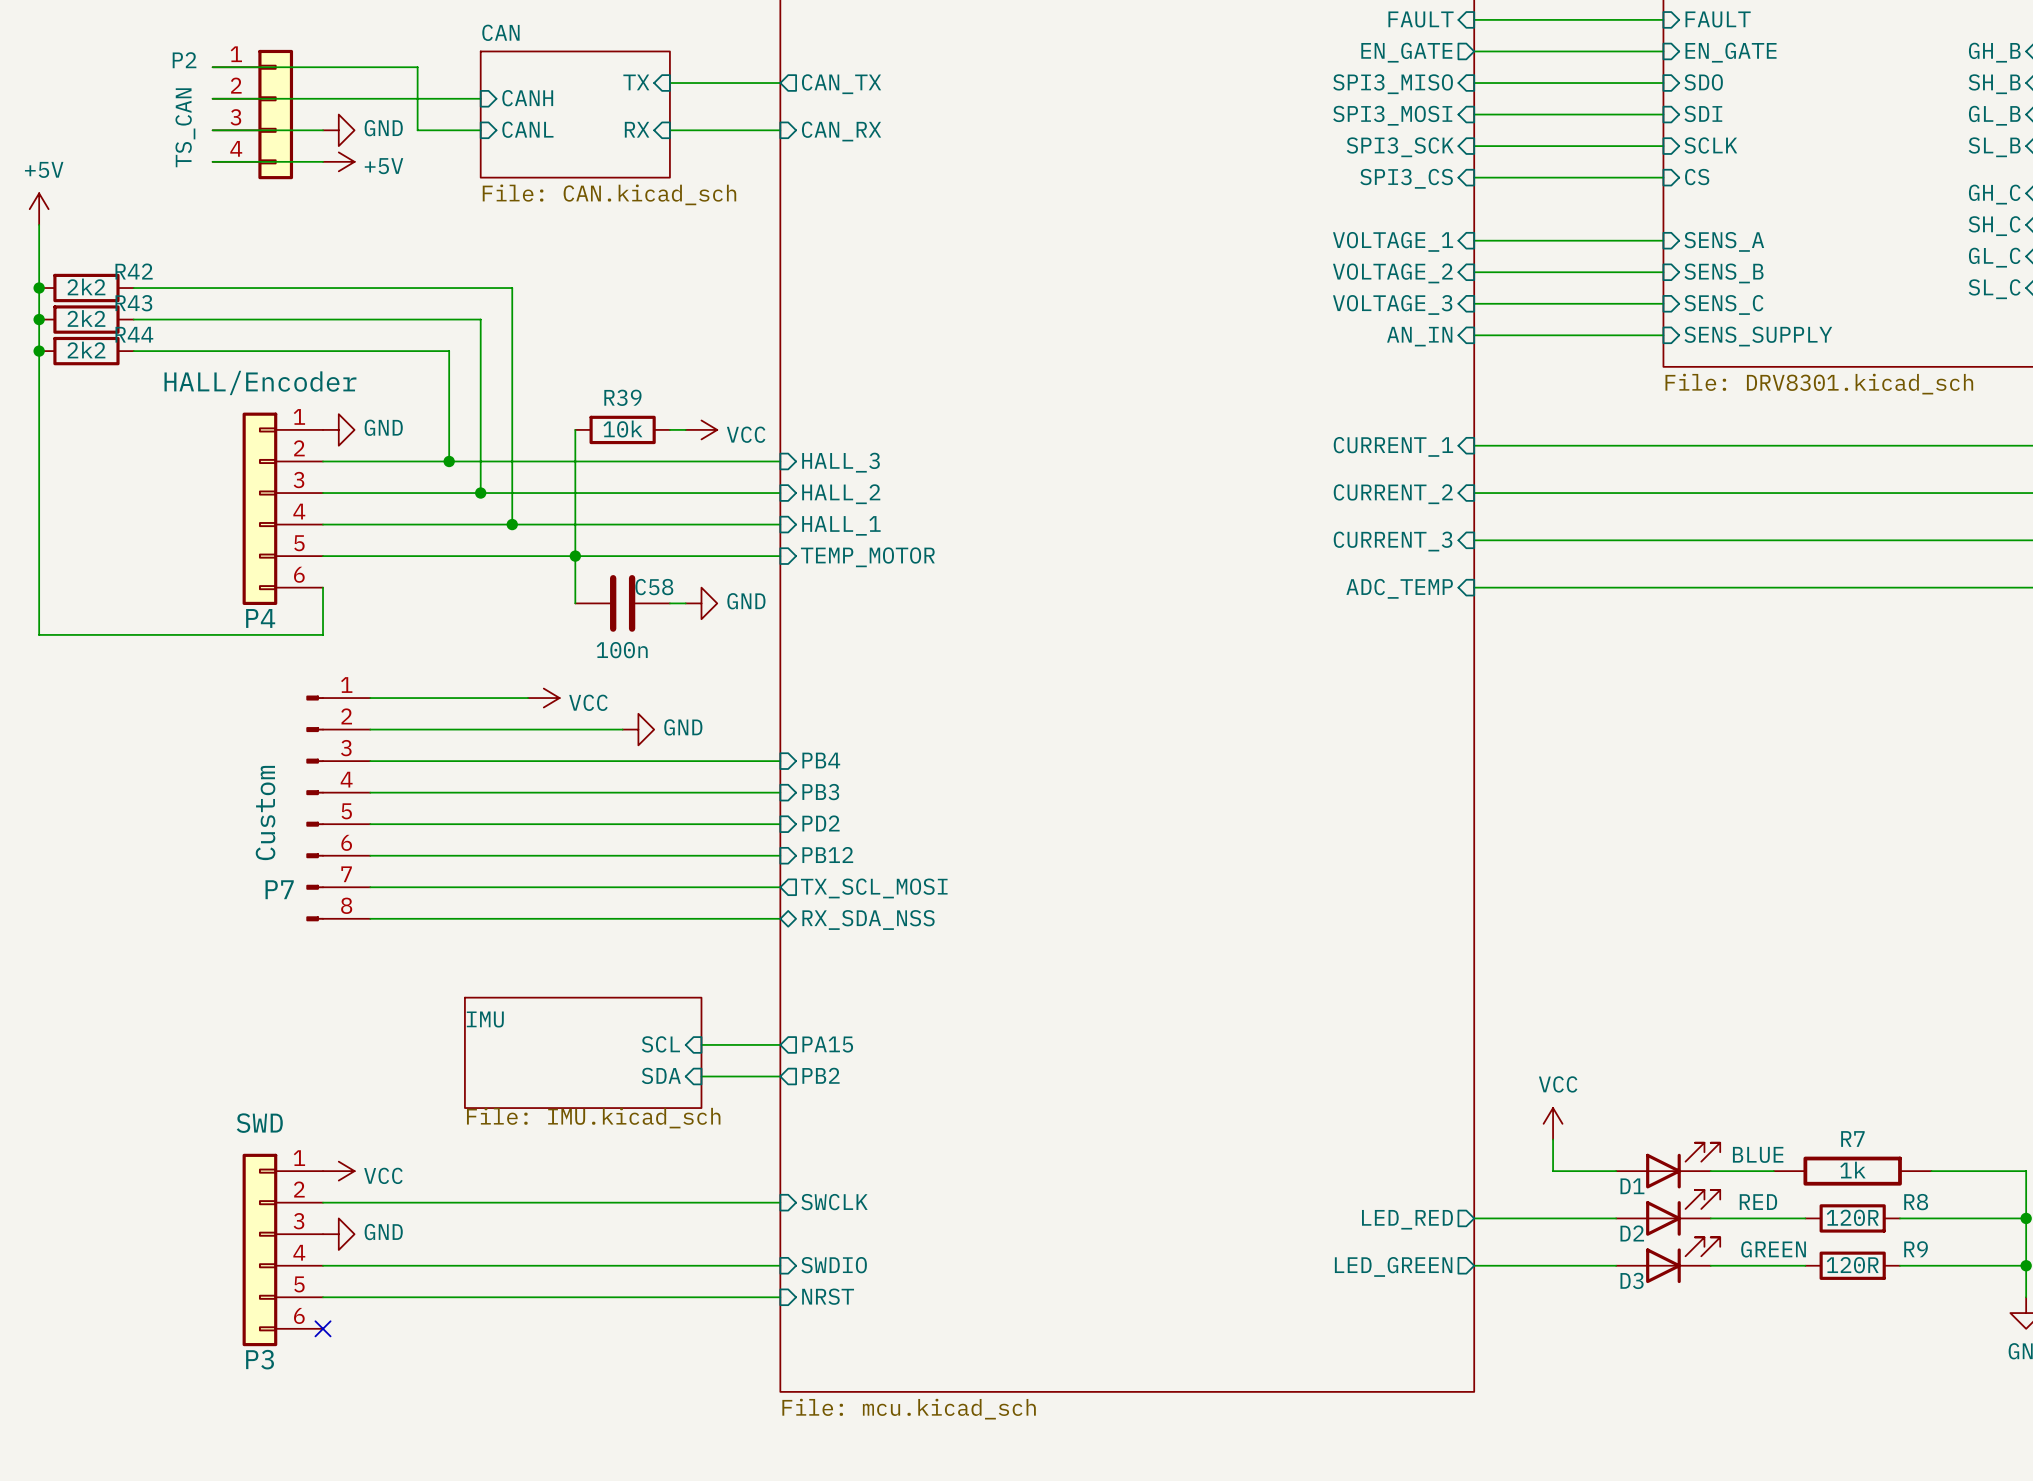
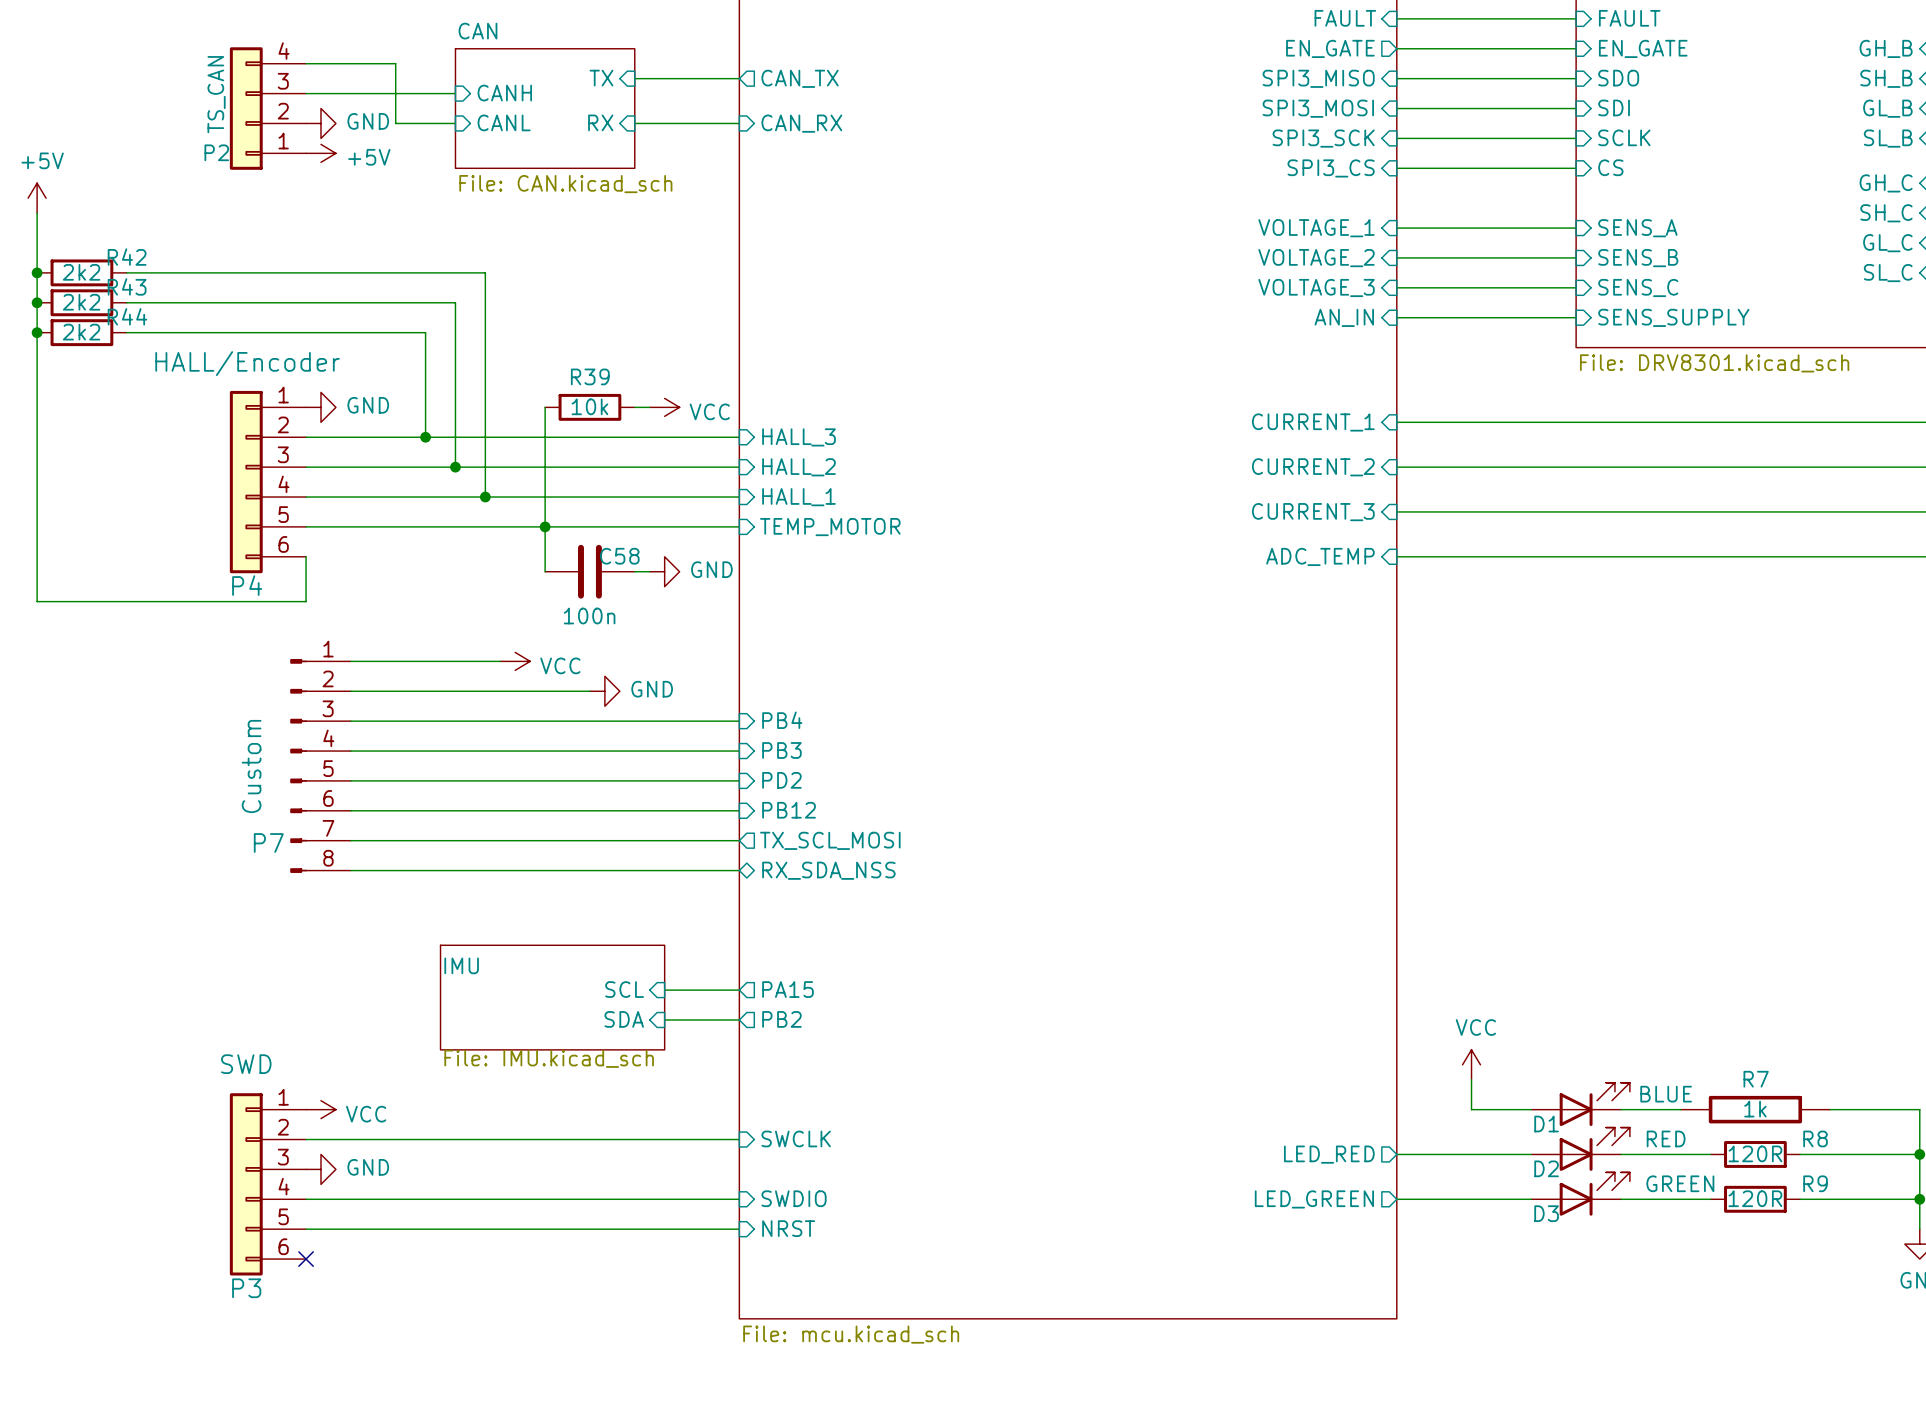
P2 name position: P2 (184, 60) -> P2 (216, 152)
P2 rotation: 0° (275, 114) -> 180° (246, 108)
P2 value position: TS_CAN (185, 127) -> TS_CAN (216, 94)

